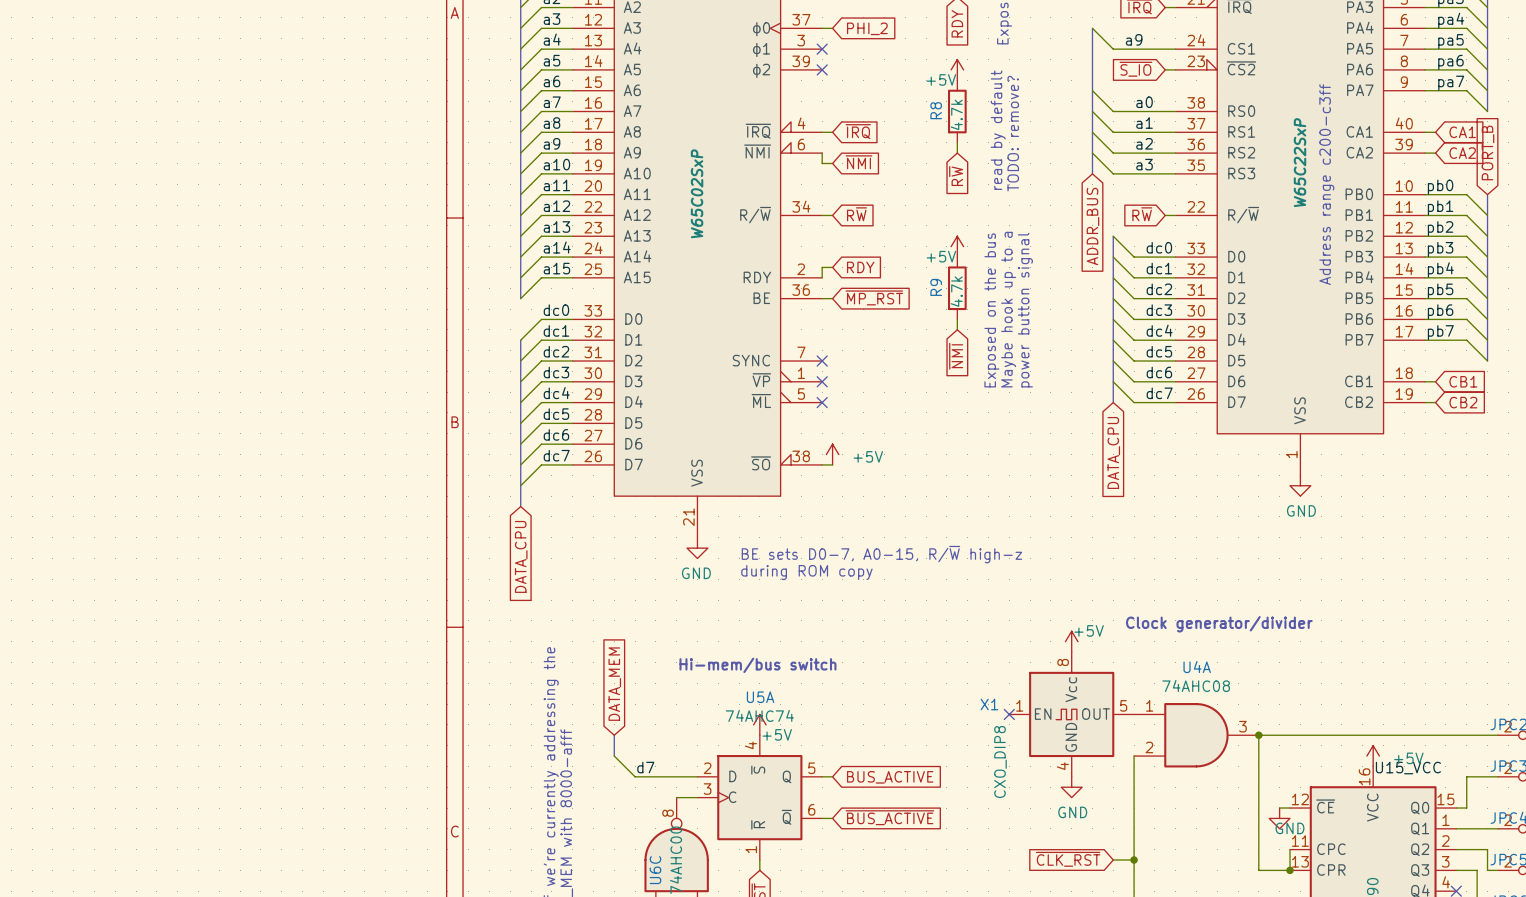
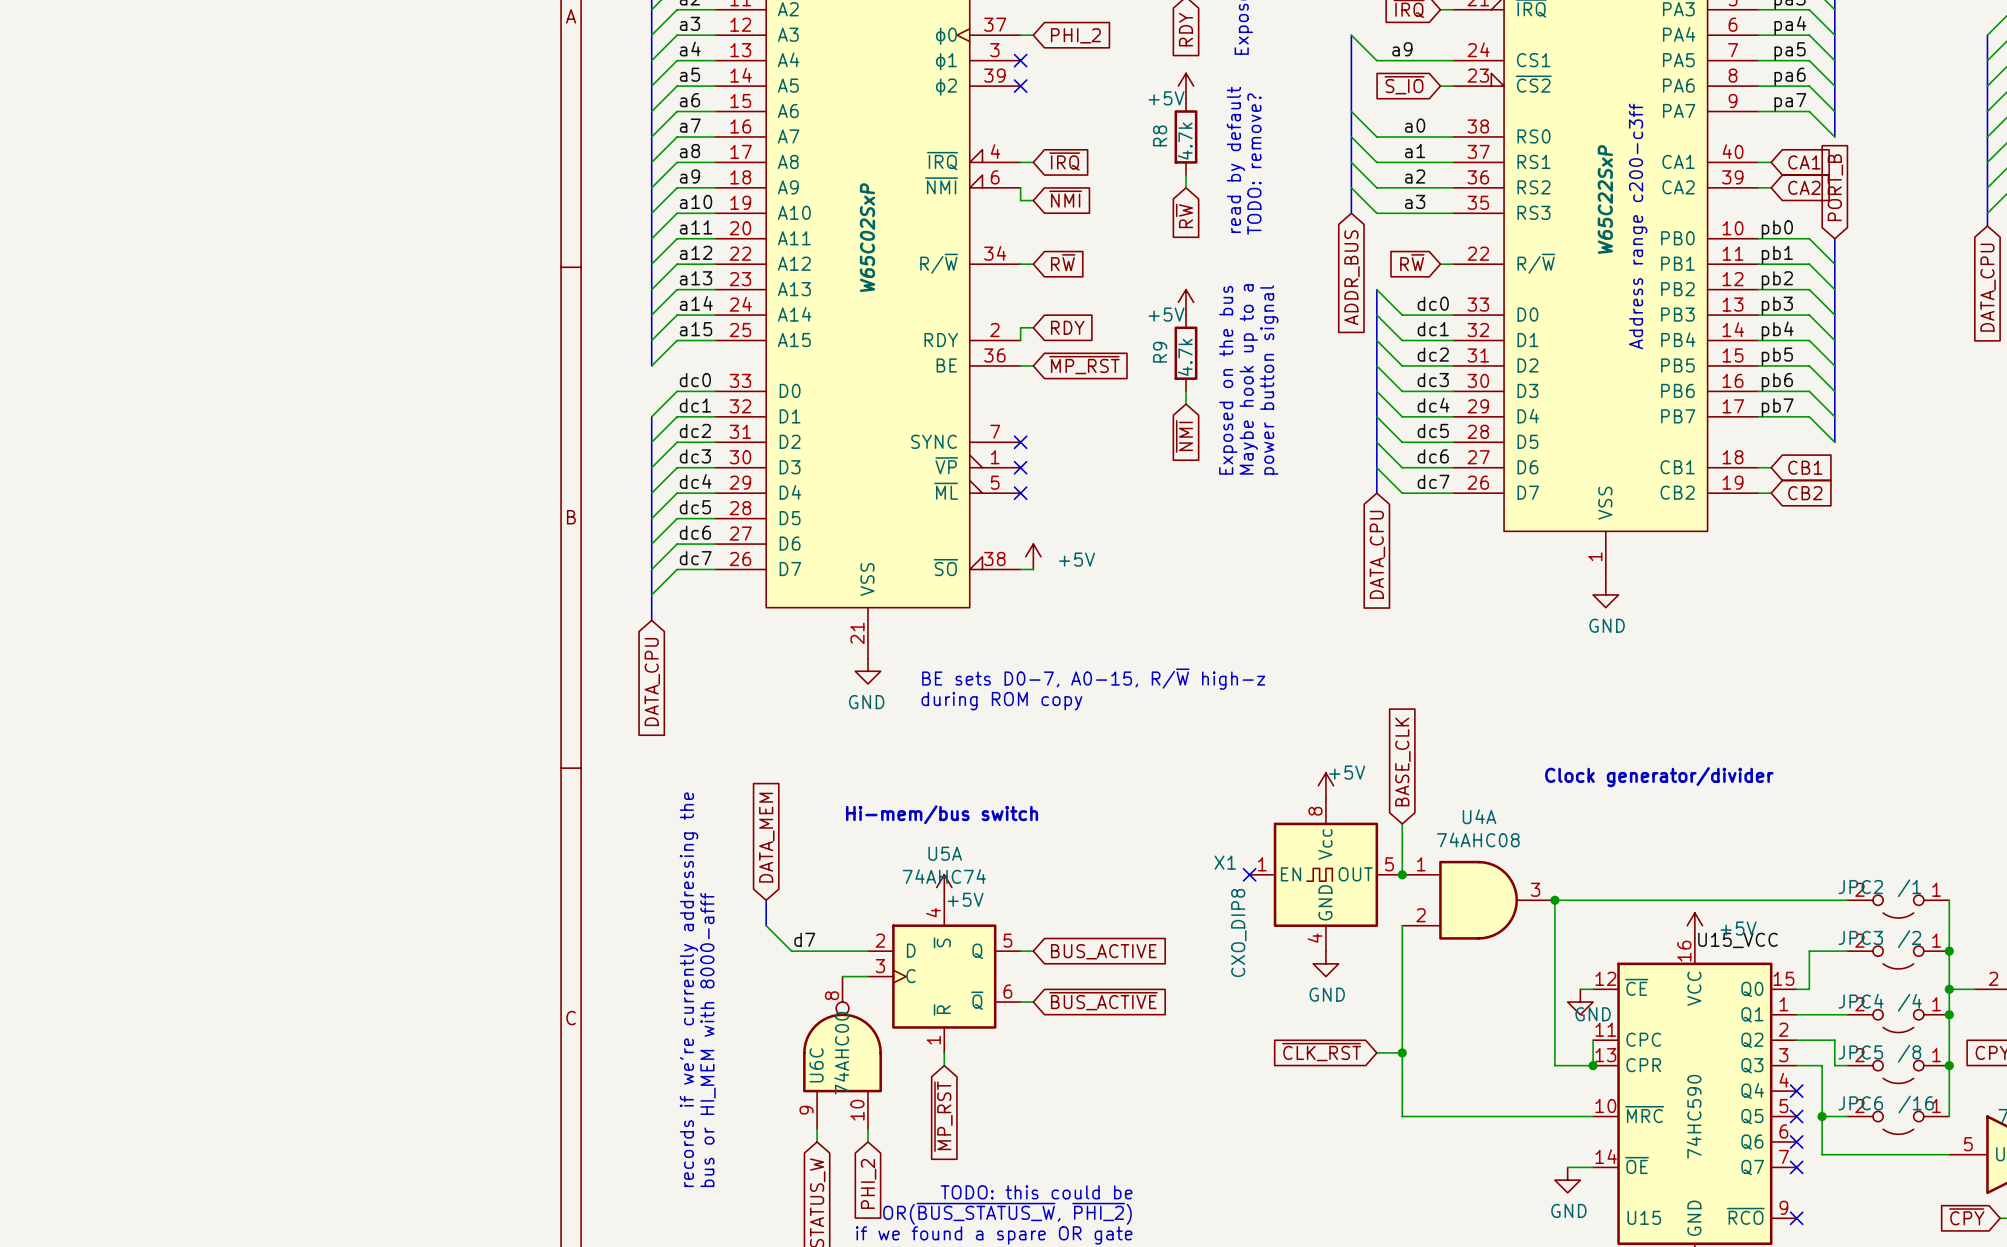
global label: none -> BASE_CLK (1402, 761)
text position: Clock generator/divider (1219, 624) -> Clock generator/divider (1659, 777)
wire: none -> (1402, 823) (1402, 874)
junction: none -> (1402, 874)

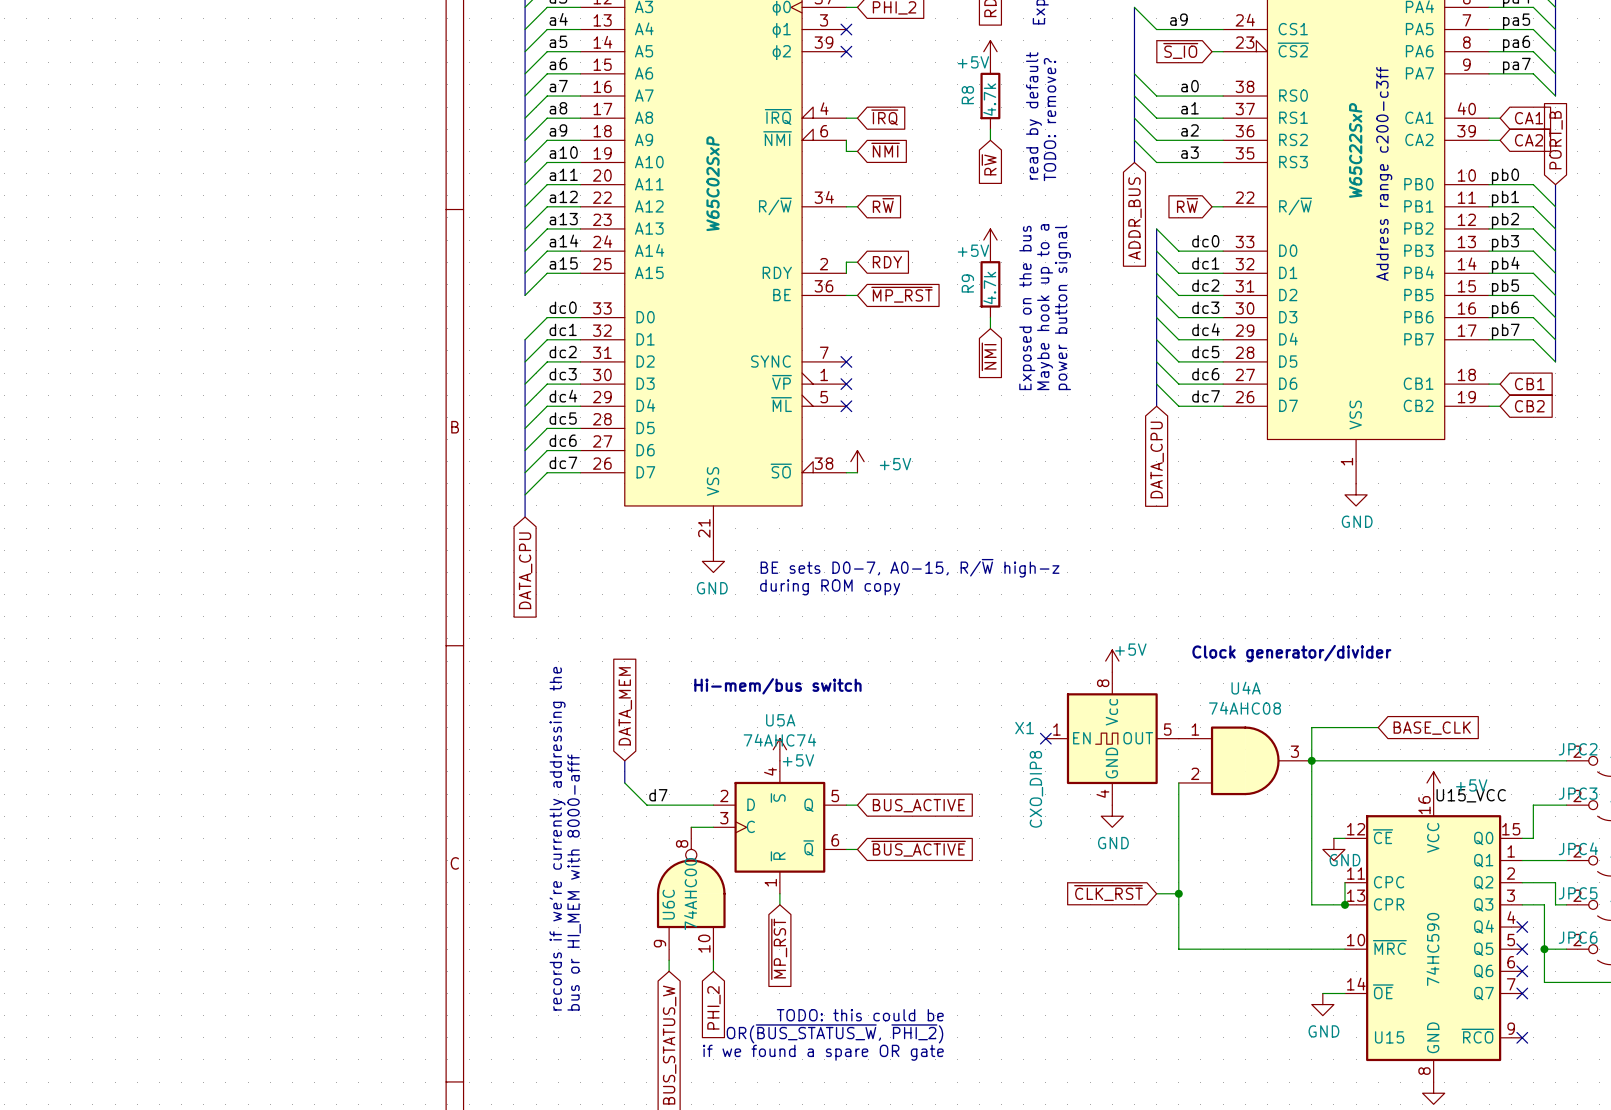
global label rotation: 0° (1402, 761) -> 90° clockwise (1432, 728)
global label position: BASE_CLK (1402, 761) -> BASE_CLK (1432, 728)
text position: Clock generator/divider (1659, 777) -> Clock generator/divider (1291, 653)
wire: (1402, 823) (1402, 874) -> none
wire: none -> (1378, 727) (1311, 727) (1311, 760)
junction: (1402, 874) -> none

